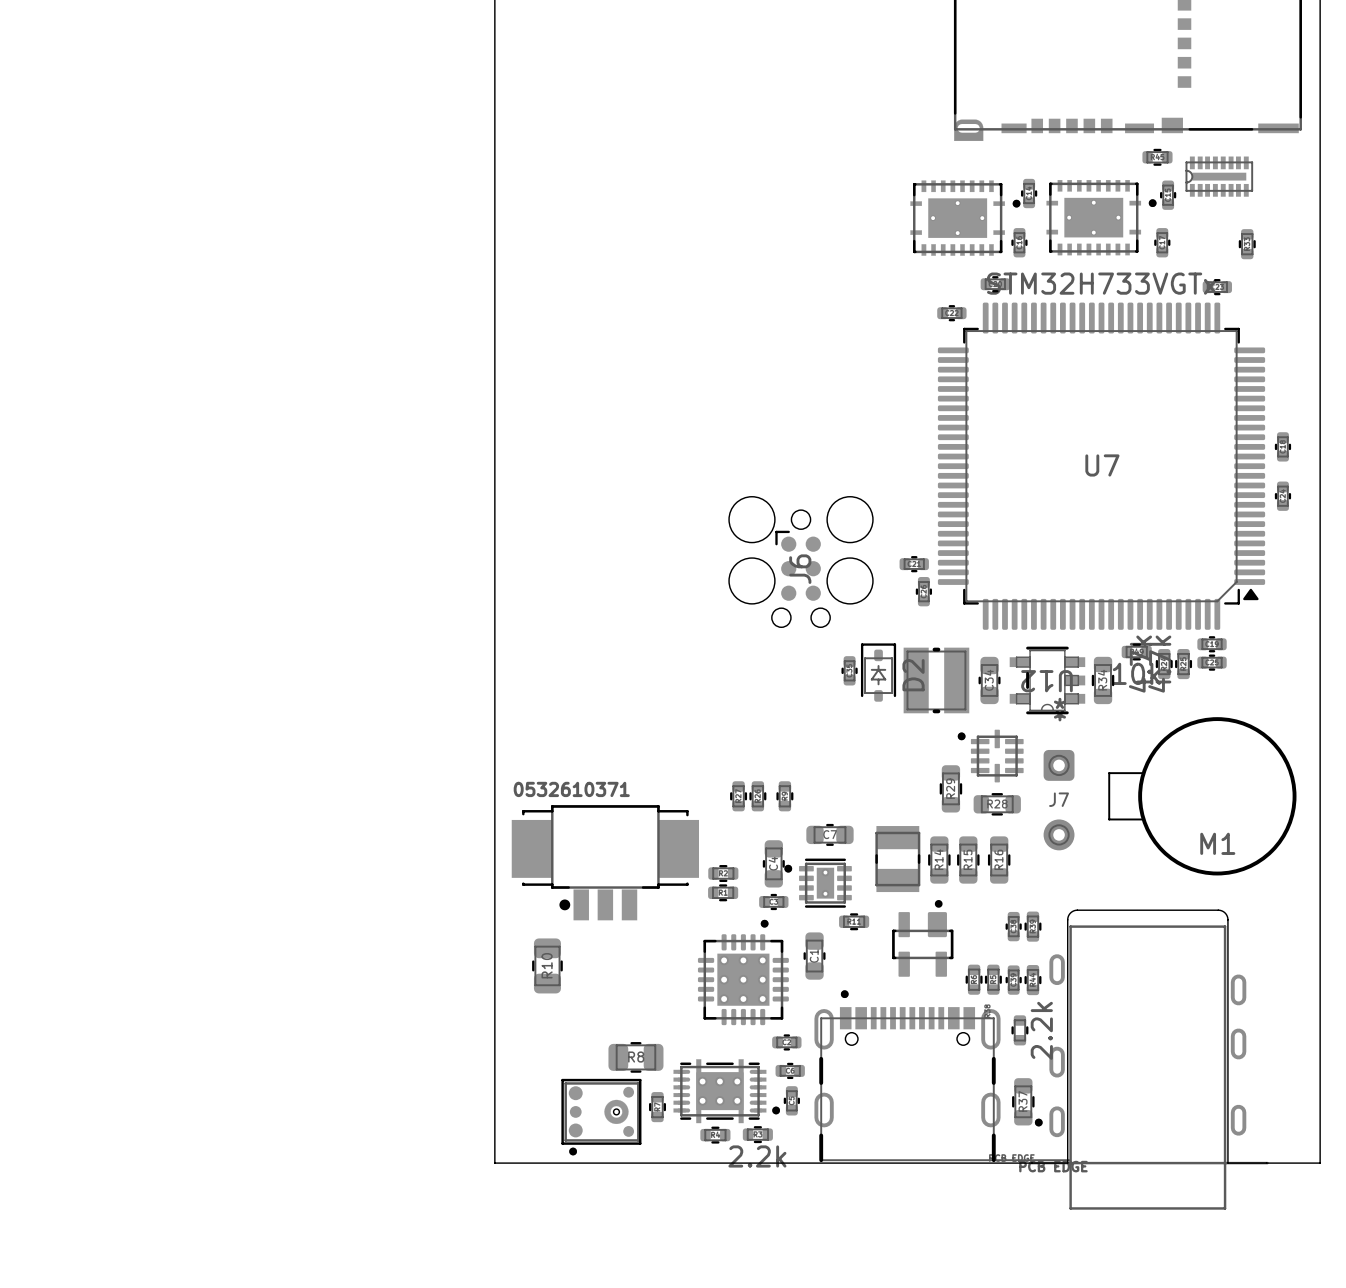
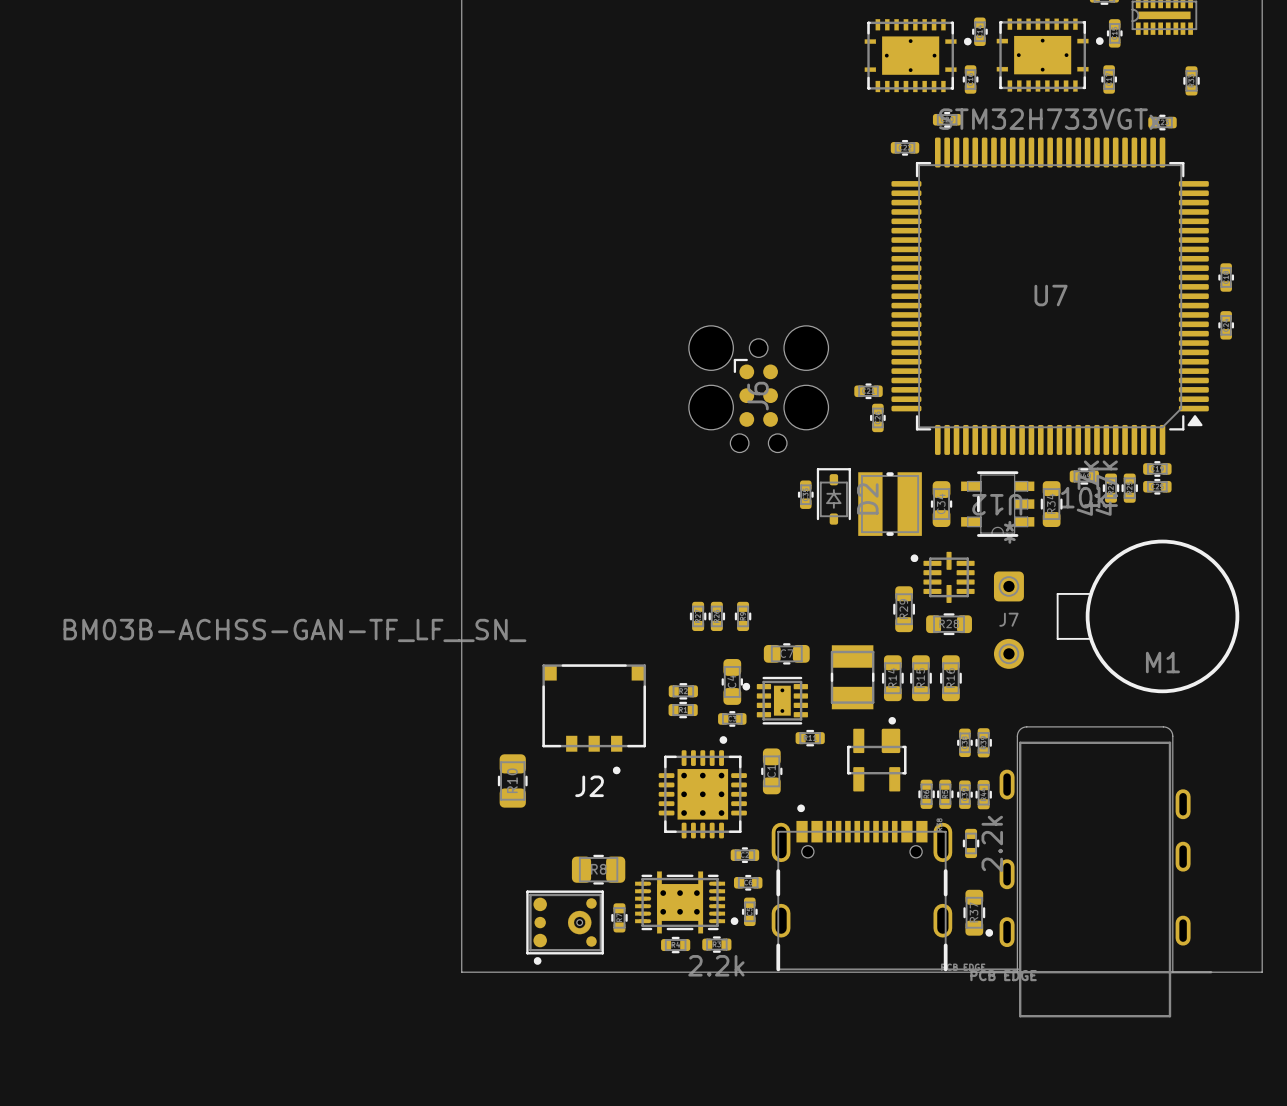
part: 0532610371 (605, 862) -> none
J2: none -> BM03B-ACHSS-GAN-TF_LF__SN_ (594, 719)

